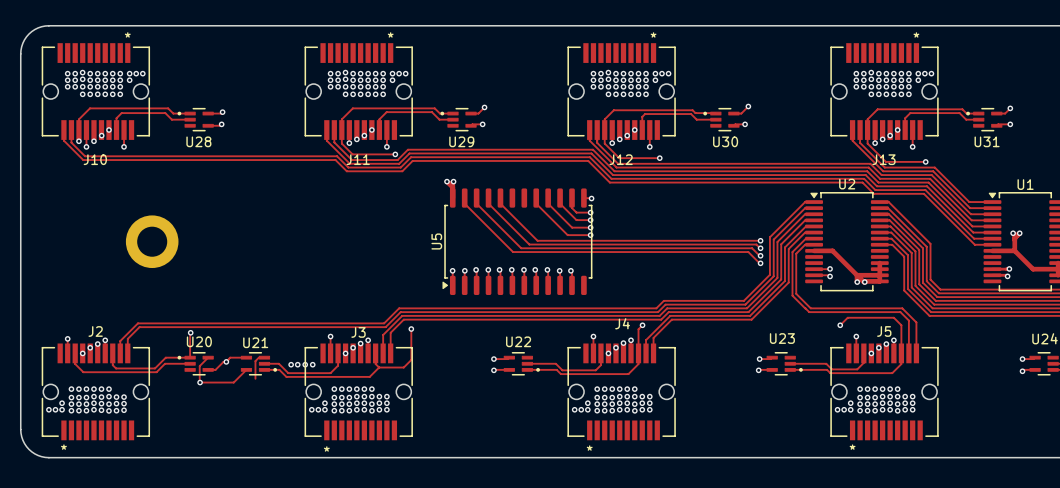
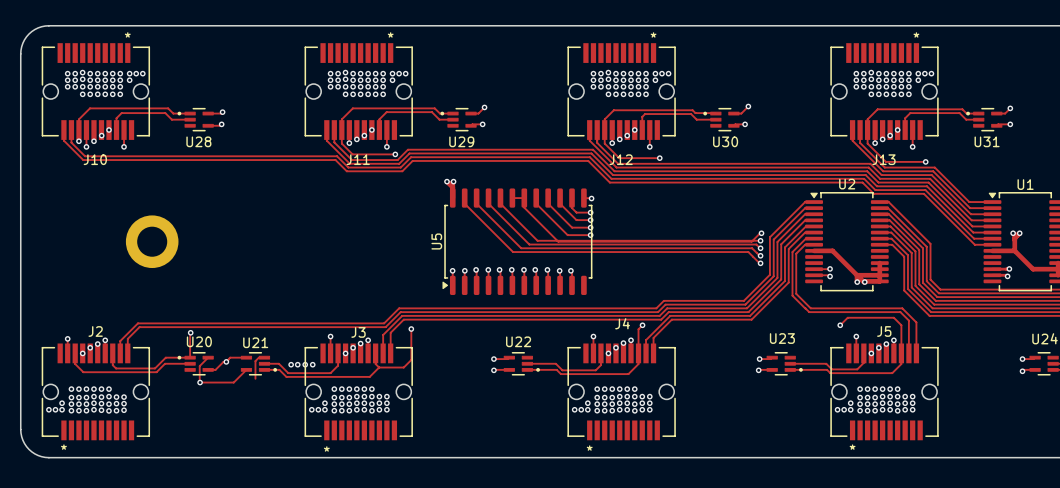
track: none -> (512, 198) (524, 198) (524, 207) (558, 241) (751, 241) (761, 233)
via: none -> (761, 233)

